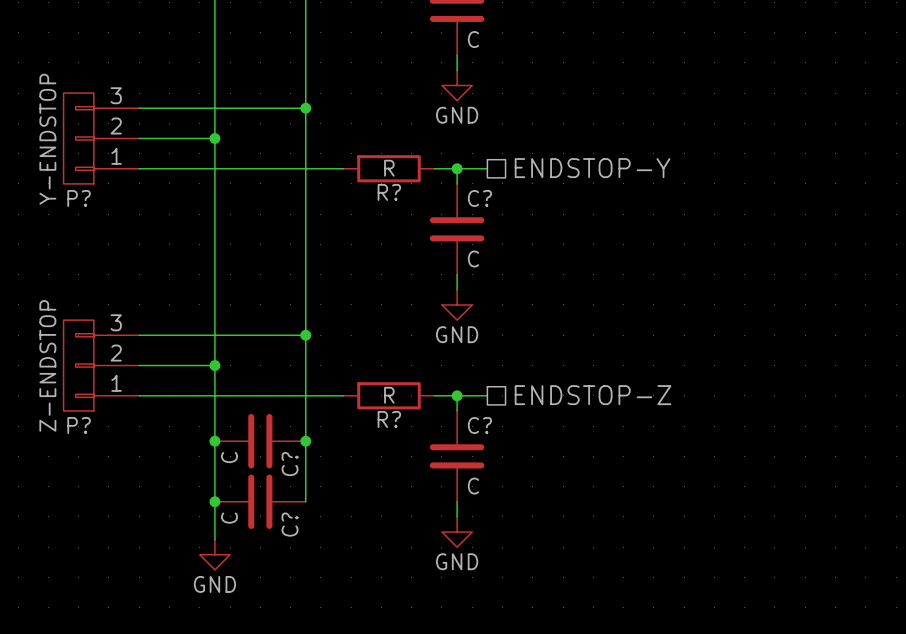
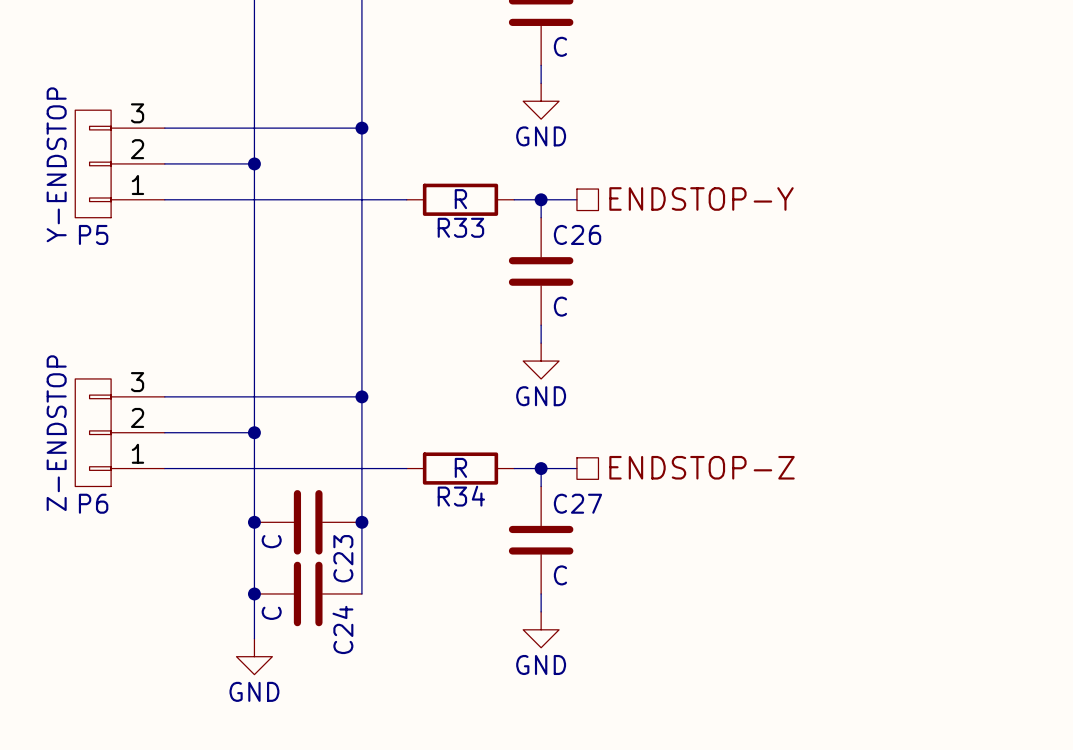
R? name: R? (389, 192) -> R33 (460, 227)
P? name: P? (79, 198) -> P5 (93, 234)
C? name: C? (479, 198) -> C26 (577, 234)
R? name: R? (389, 419) -> R34 (461, 496)
P? name: P? (79, 425) -> P6 (93, 503)
C? name: C? (479, 425) -> C27 (577, 503)
C? name: C? (290, 464) -> C23 (343, 558)
C? name: C? (290, 524) -> C24 (342, 629)

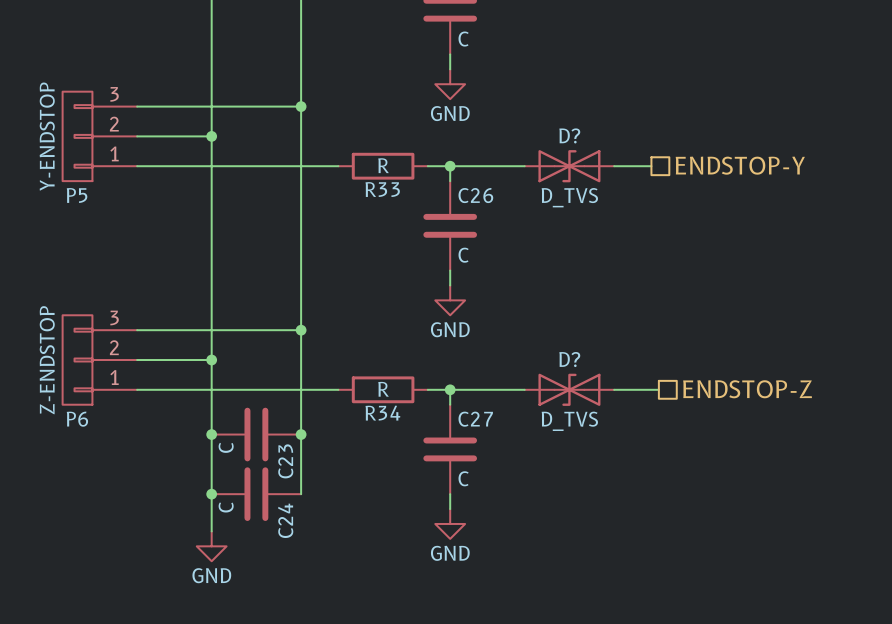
hierarchical label position: ENDSTOP-Y (701, 198) -> ENDSTOP-Y (740, 165)
wire: none -> (480, 166) (524, 166)
D?: none -> D_TVS (569, 166)
wire: none -> (614, 166) (651, 166)
hierarchical label position: ENDSTOP-Z (702, 467) -> ENDSTOP-Z (747, 389)
wire: none -> (480, 389) (524, 389)
D?: none -> D_TVS (569, 389)
wire: none -> (614, 389) (658, 389)

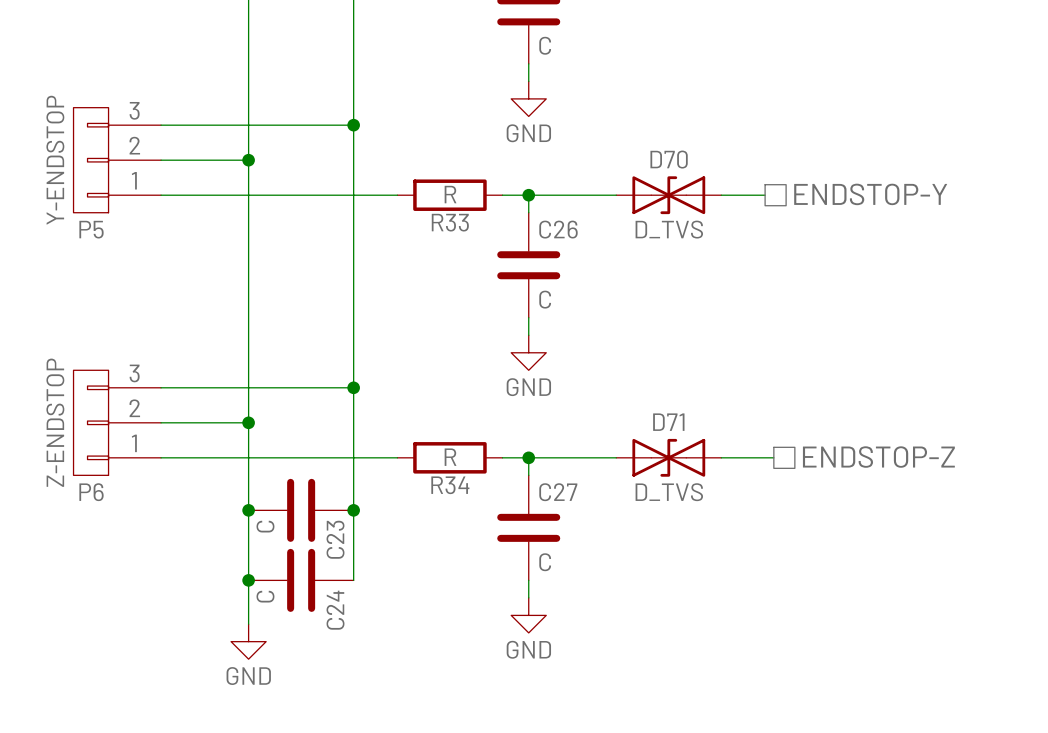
D? name: D? (569, 135) -> D70 (669, 159)
D? name: D? (569, 359) -> D71 (668, 422)

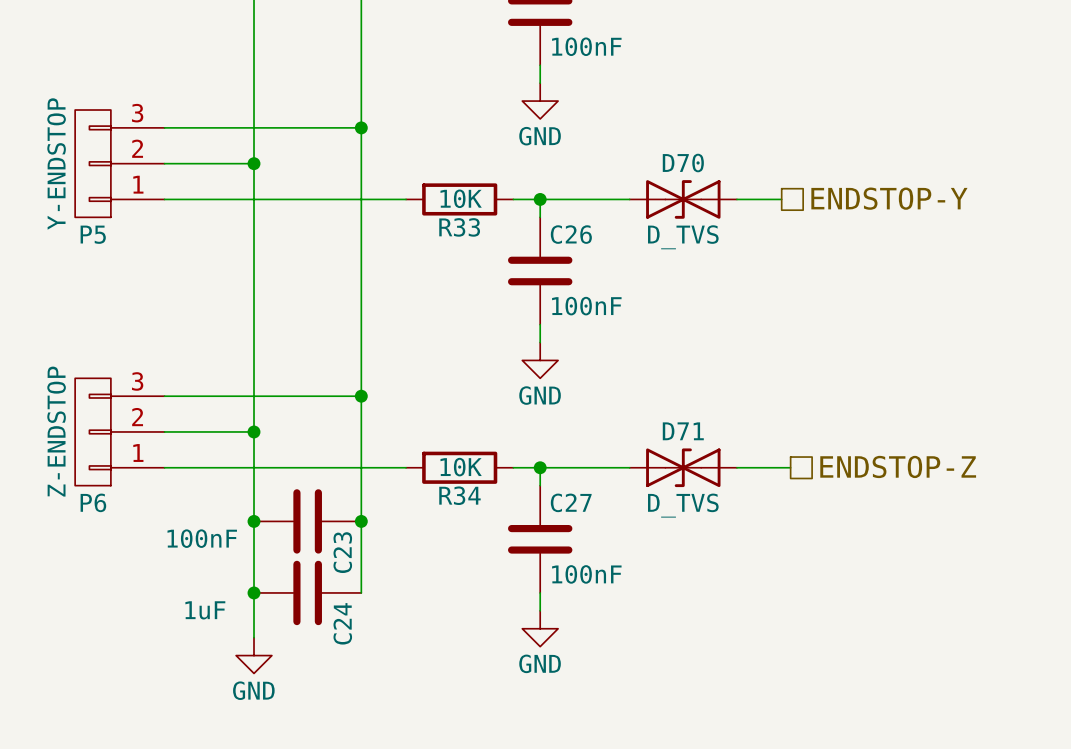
part value: C (545, 45) -> 100nF (586, 46)
R33 value: R (450, 194) -> 10K (461, 198)
C26 value: C (545, 299) -> 100nF (586, 306)
R34 value: R (450, 457) -> 10K (461, 467)
C23 value: C (265, 526) -> 100nF (202, 538)
C27 value: C (545, 562) -> 100nF (586, 574)
C24 value: C (265, 596) -> 1uF (205, 610)

